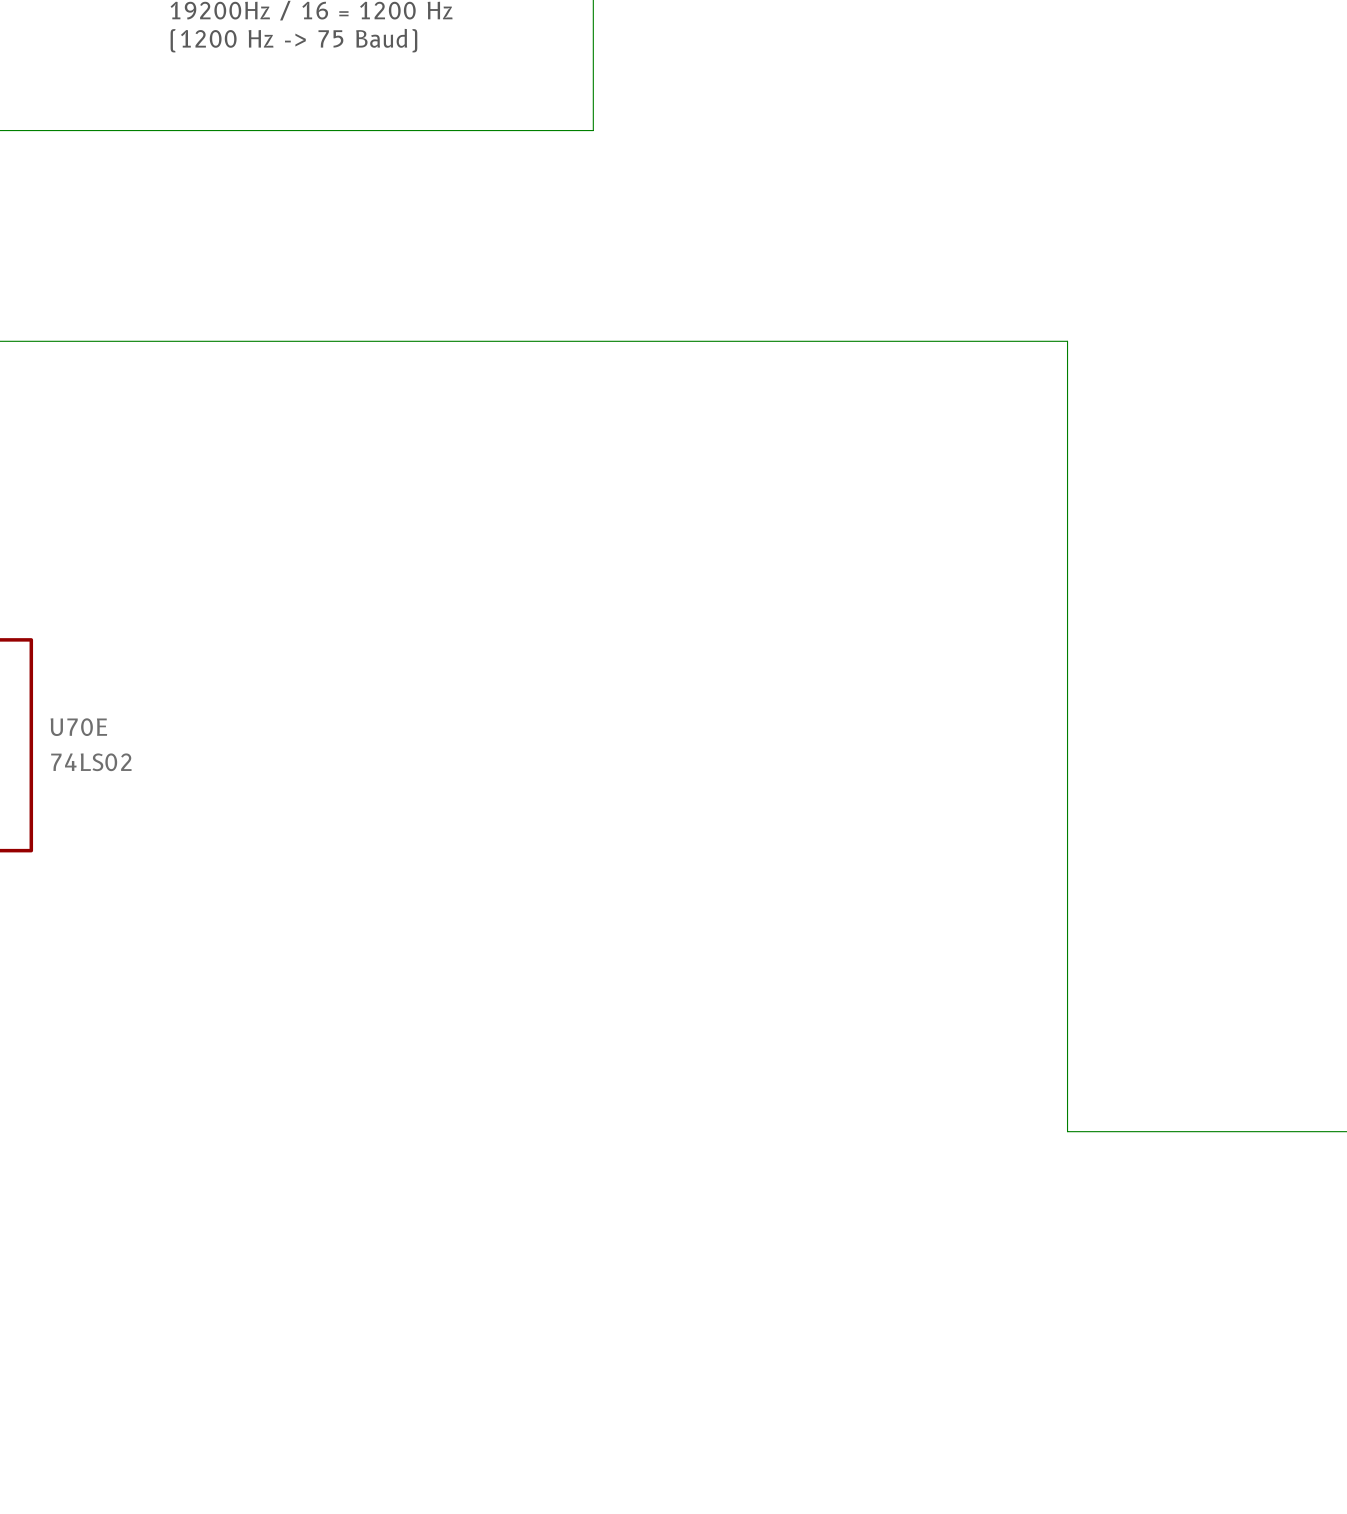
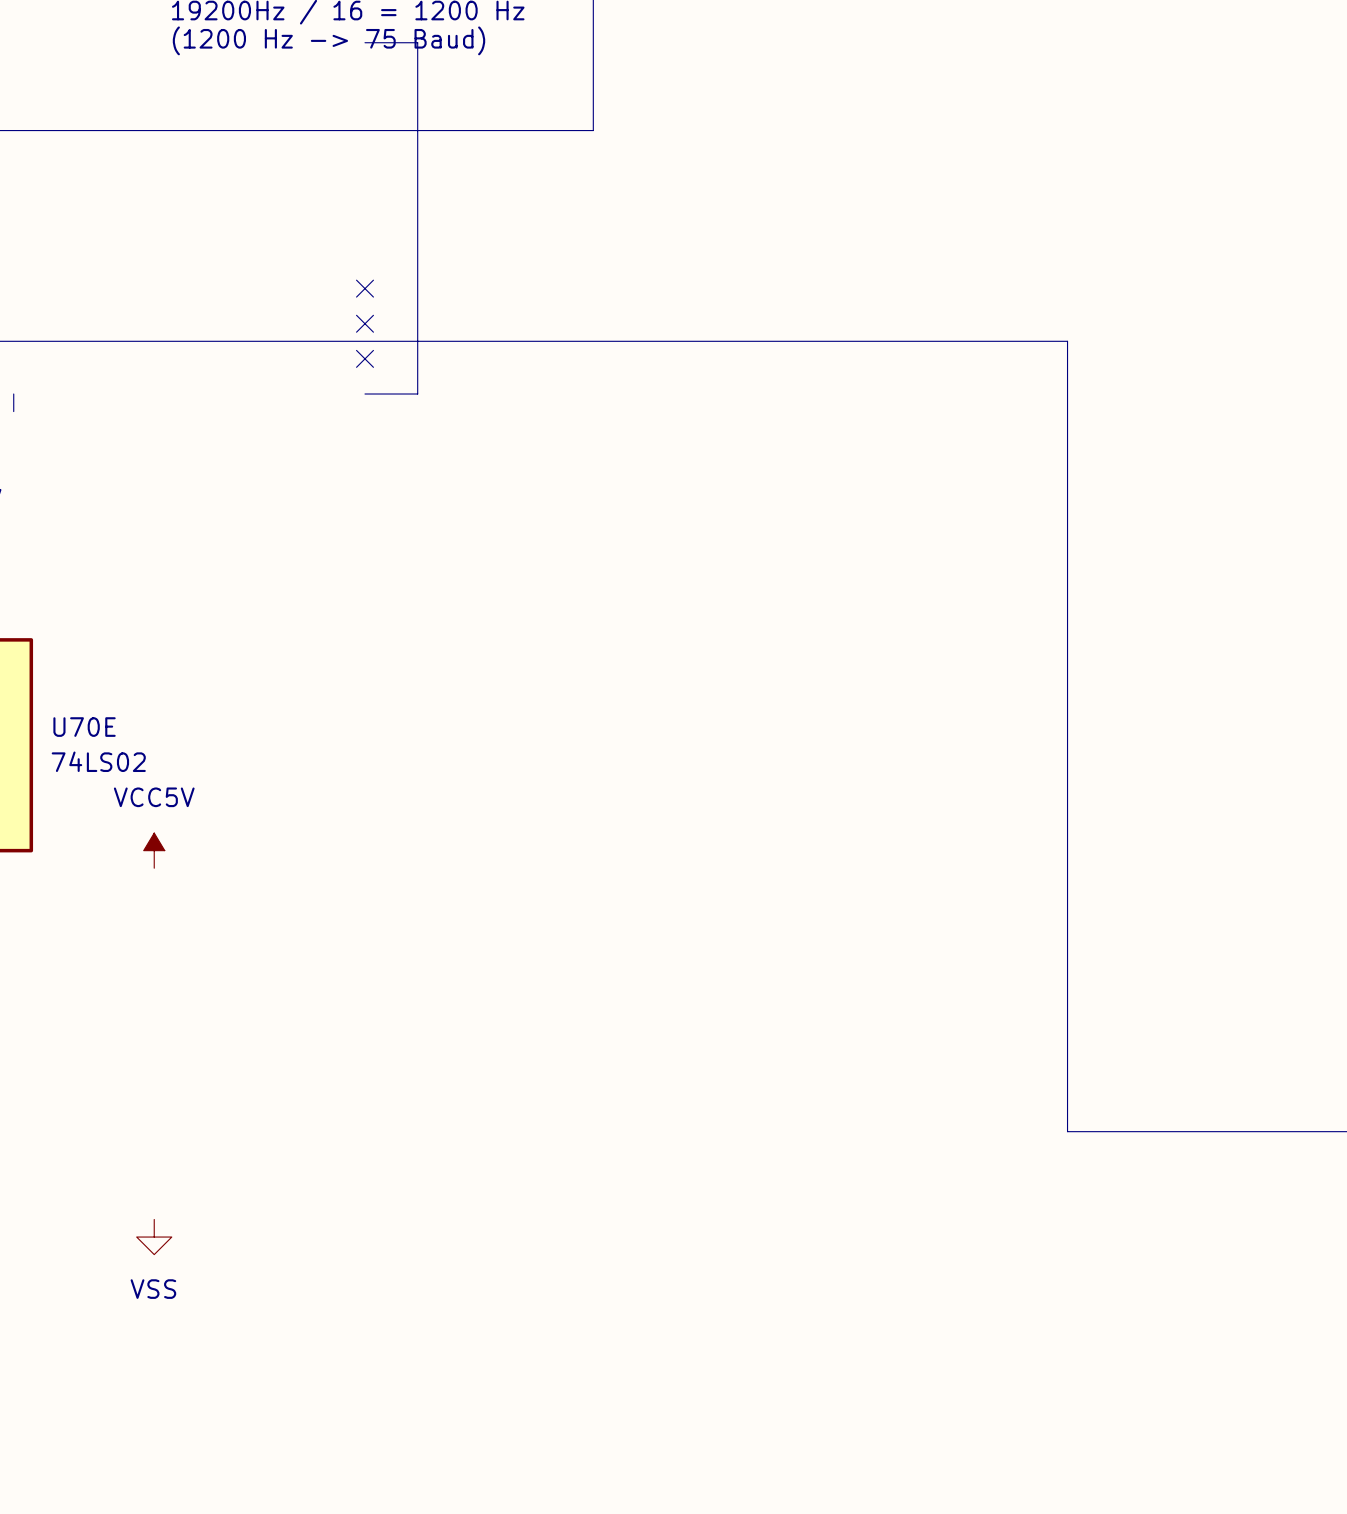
wire: none -> (365, 42) (417, 42) (417, 394) (365, 394)
no-connect mark: none -> (365, 288)
no-connect mark: none -> (365, 323)
no-connect mark: none -> (365, 358)
wire: none -> (13, 394) (13, 411)
power symbol: none -> VCC5V (154, 850)
power symbol: none -> VSS (154, 1237)

